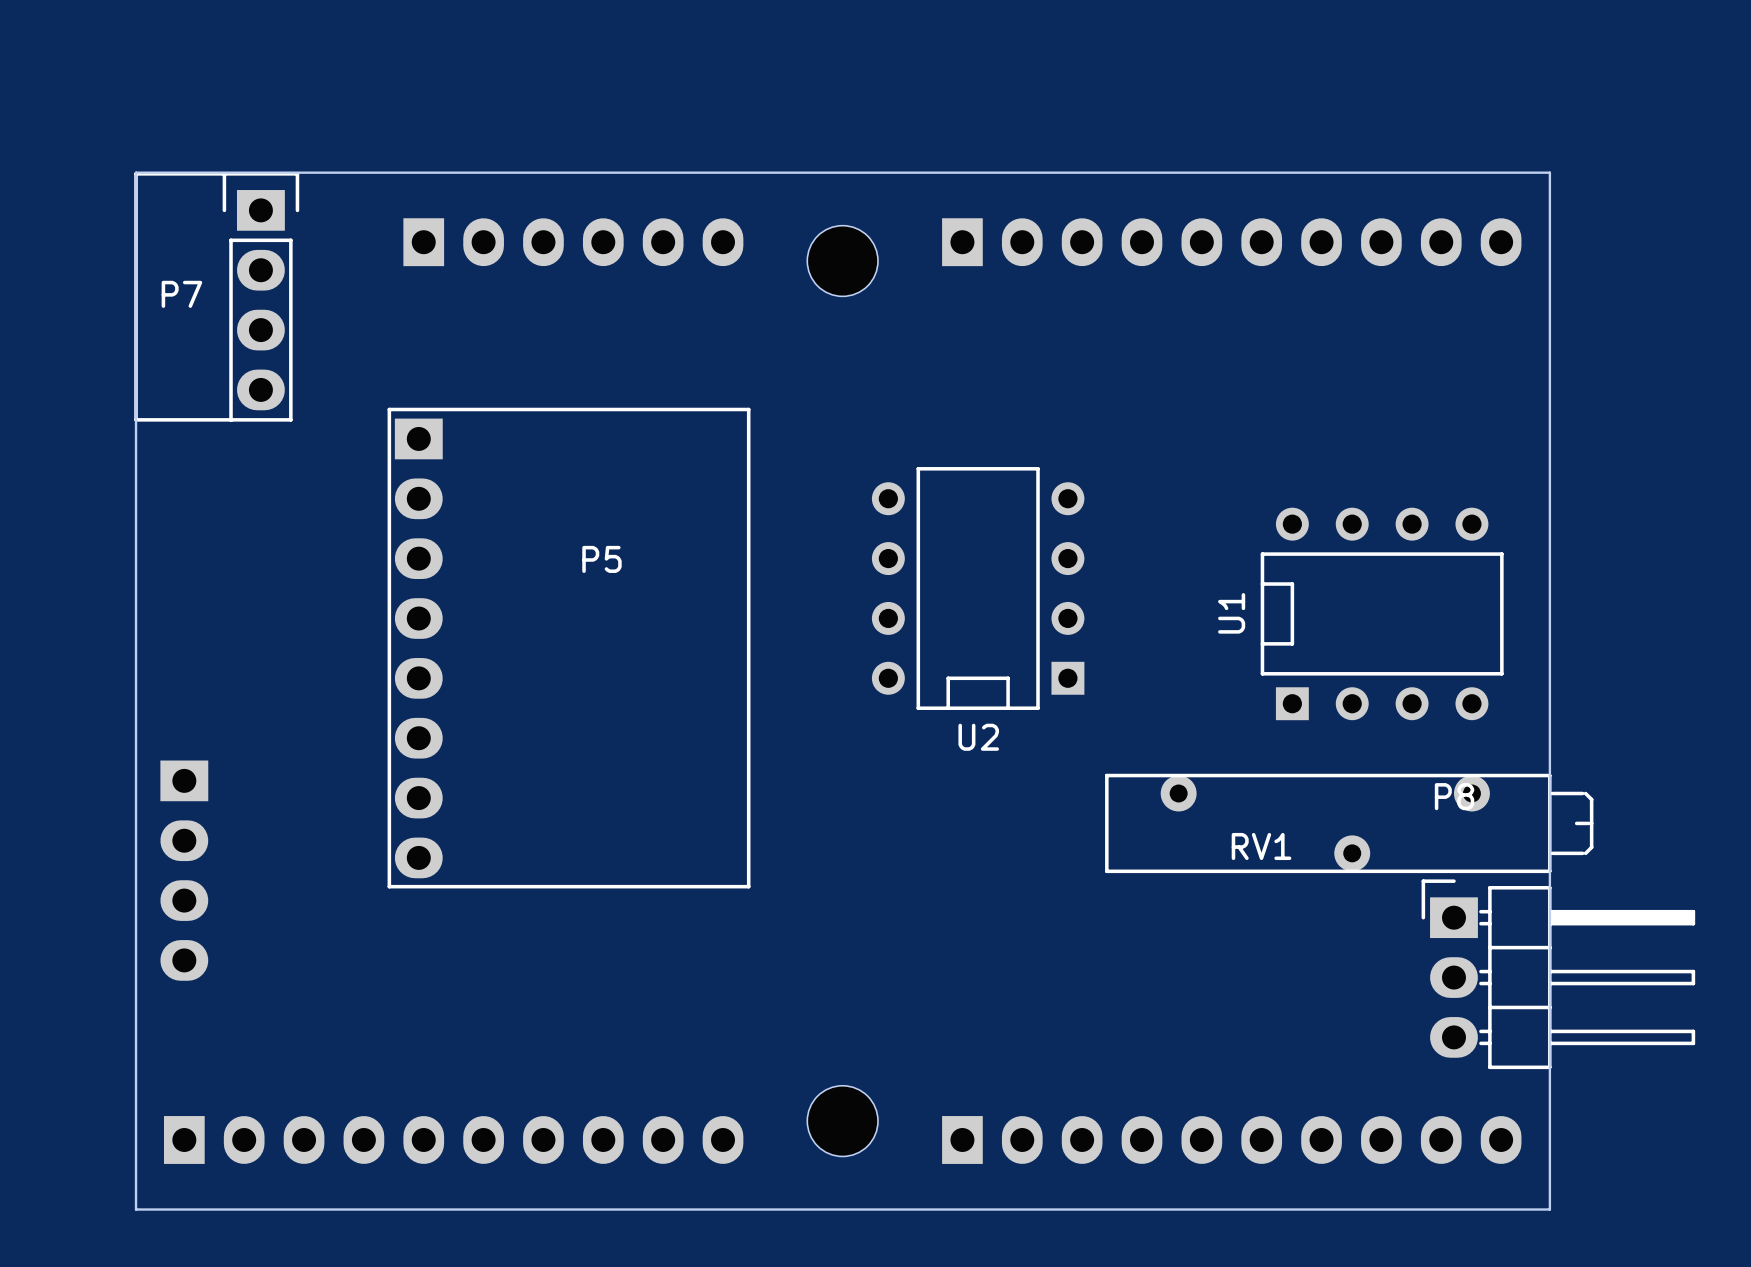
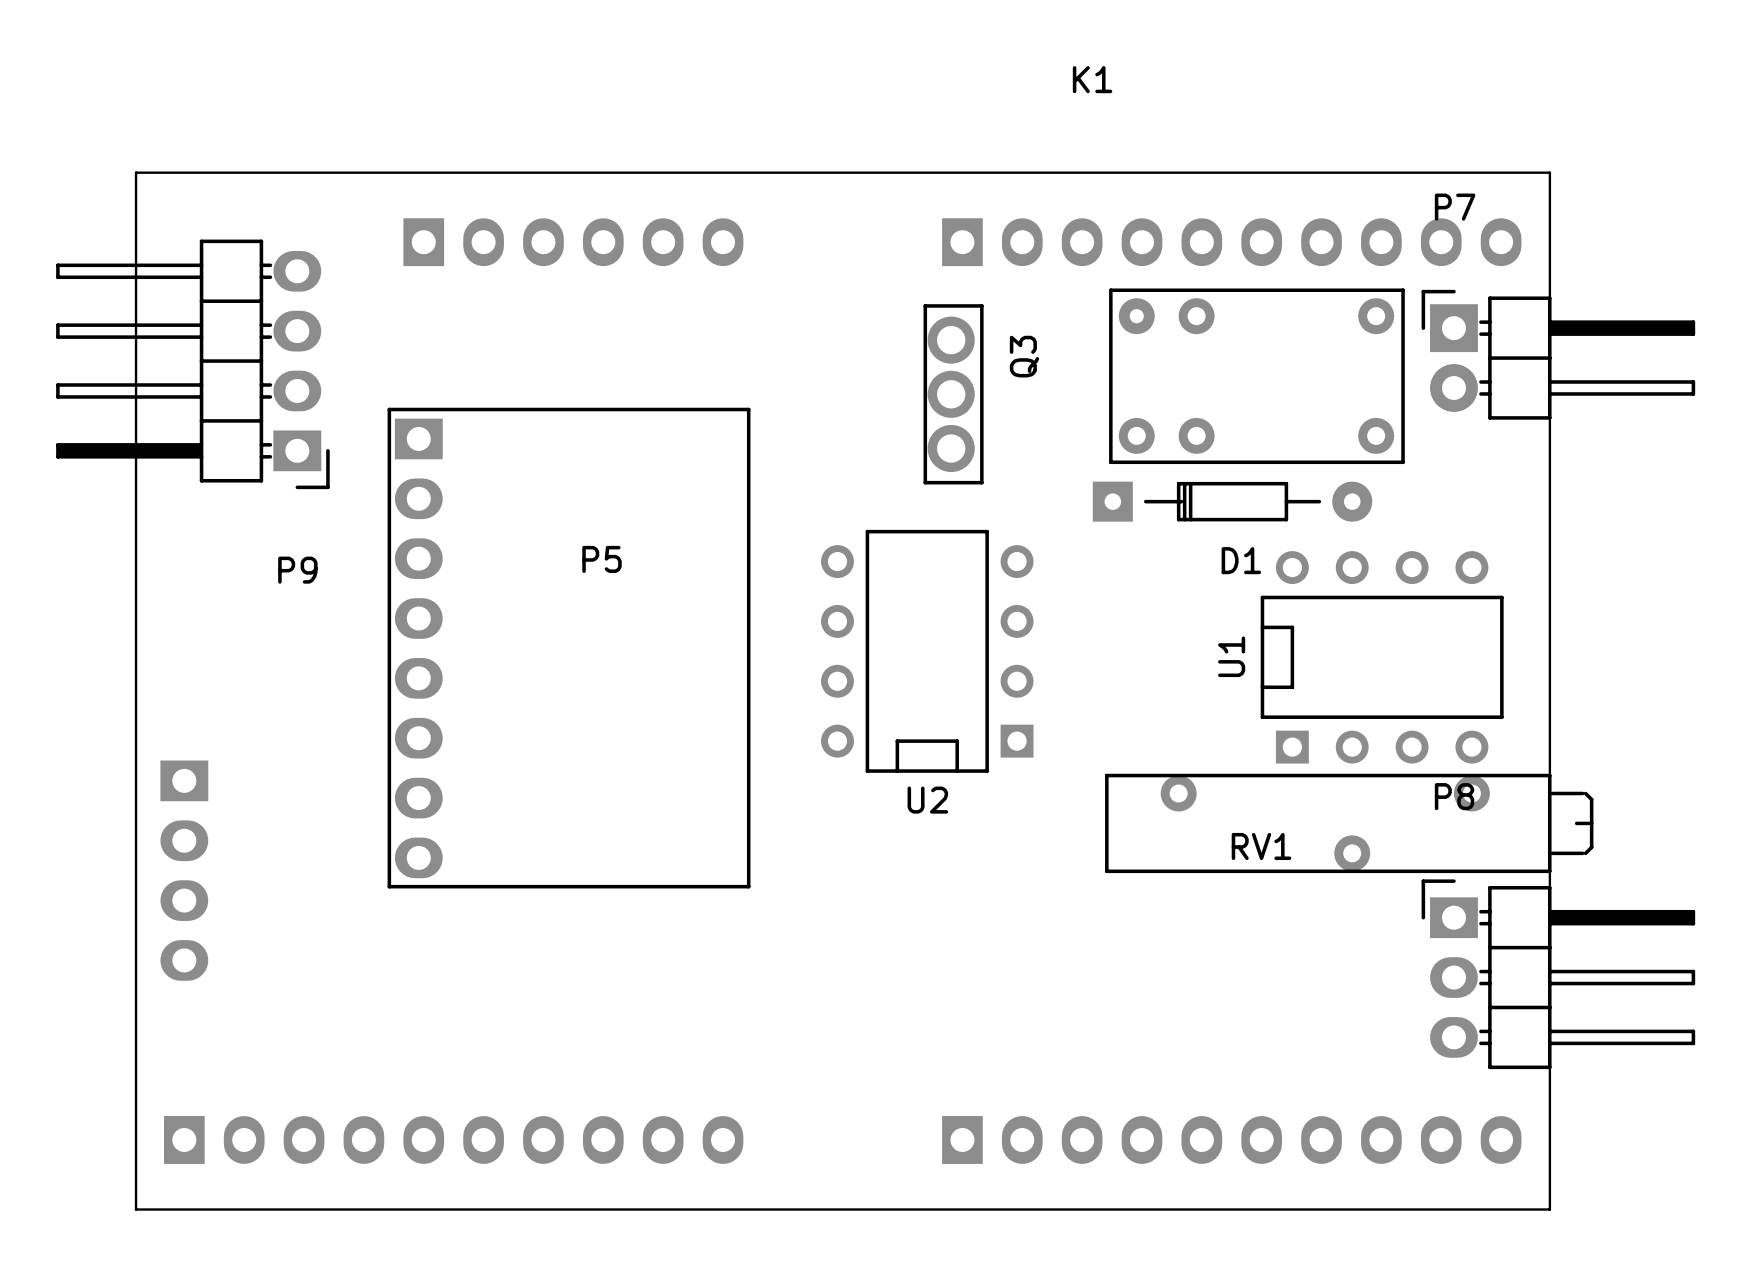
P7 footprint: [134, 172, 300, 422] -> [1421, 289, 1696, 420]
part: (842, 261) -> none
P7 name position: P7 (181, 294) -> P7 (1455, 207)
P9: none -> (192, 364)
K1: none -> (1256, 376)
Q3: none -> (953, 394)
D1: none -> (1232, 501)
U2 position: (978, 588) -> (927, 651)
U1 position: (1382, 613) -> (1382, 657)
part: (842, 1121) -> none

